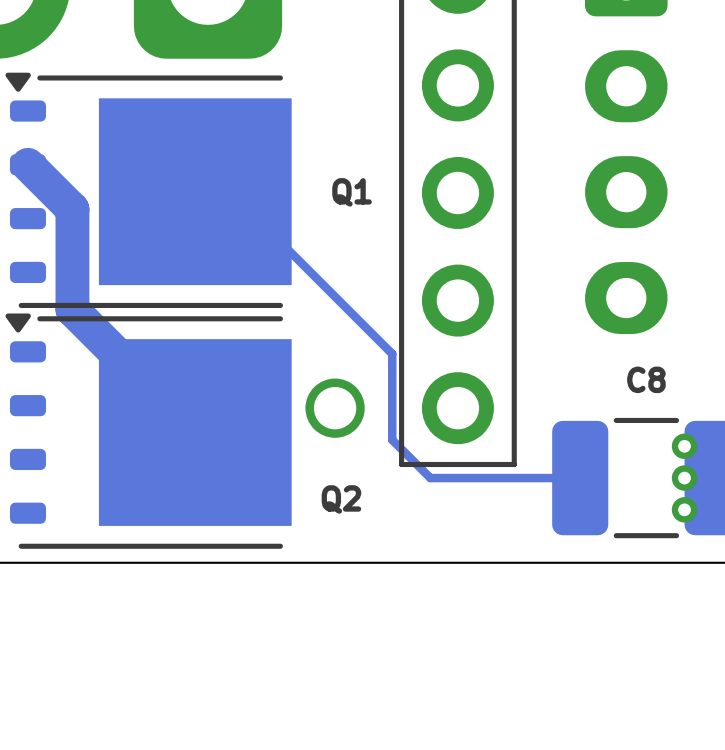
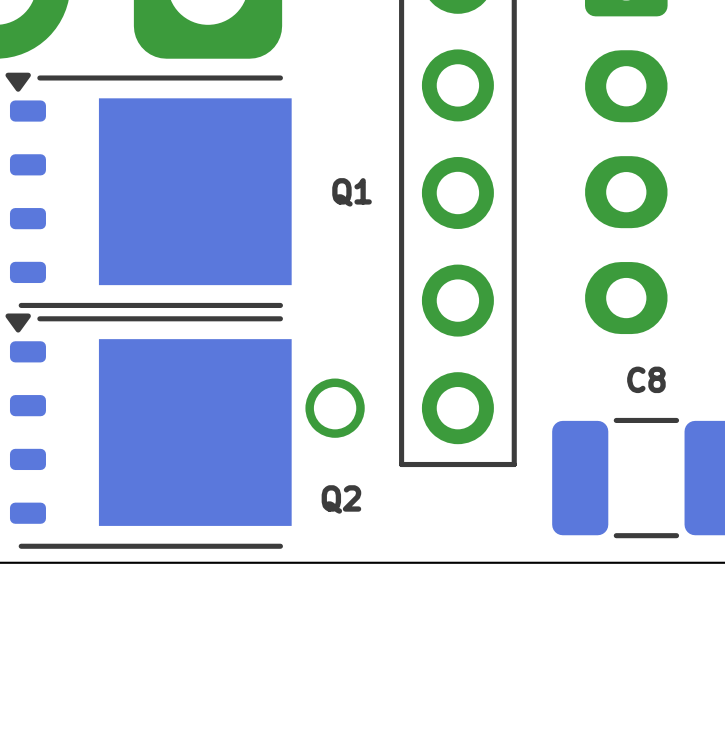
track: (27, 164) (72, 209) (72, 309) (195, 432) -> none
track: (195, 191) (230, 191) (392, 353) (392, 439) (430, 478) (580, 478) -> none
via: (684, 446) -> none
via: (684, 478) -> none
via: (684, 509) -> none

